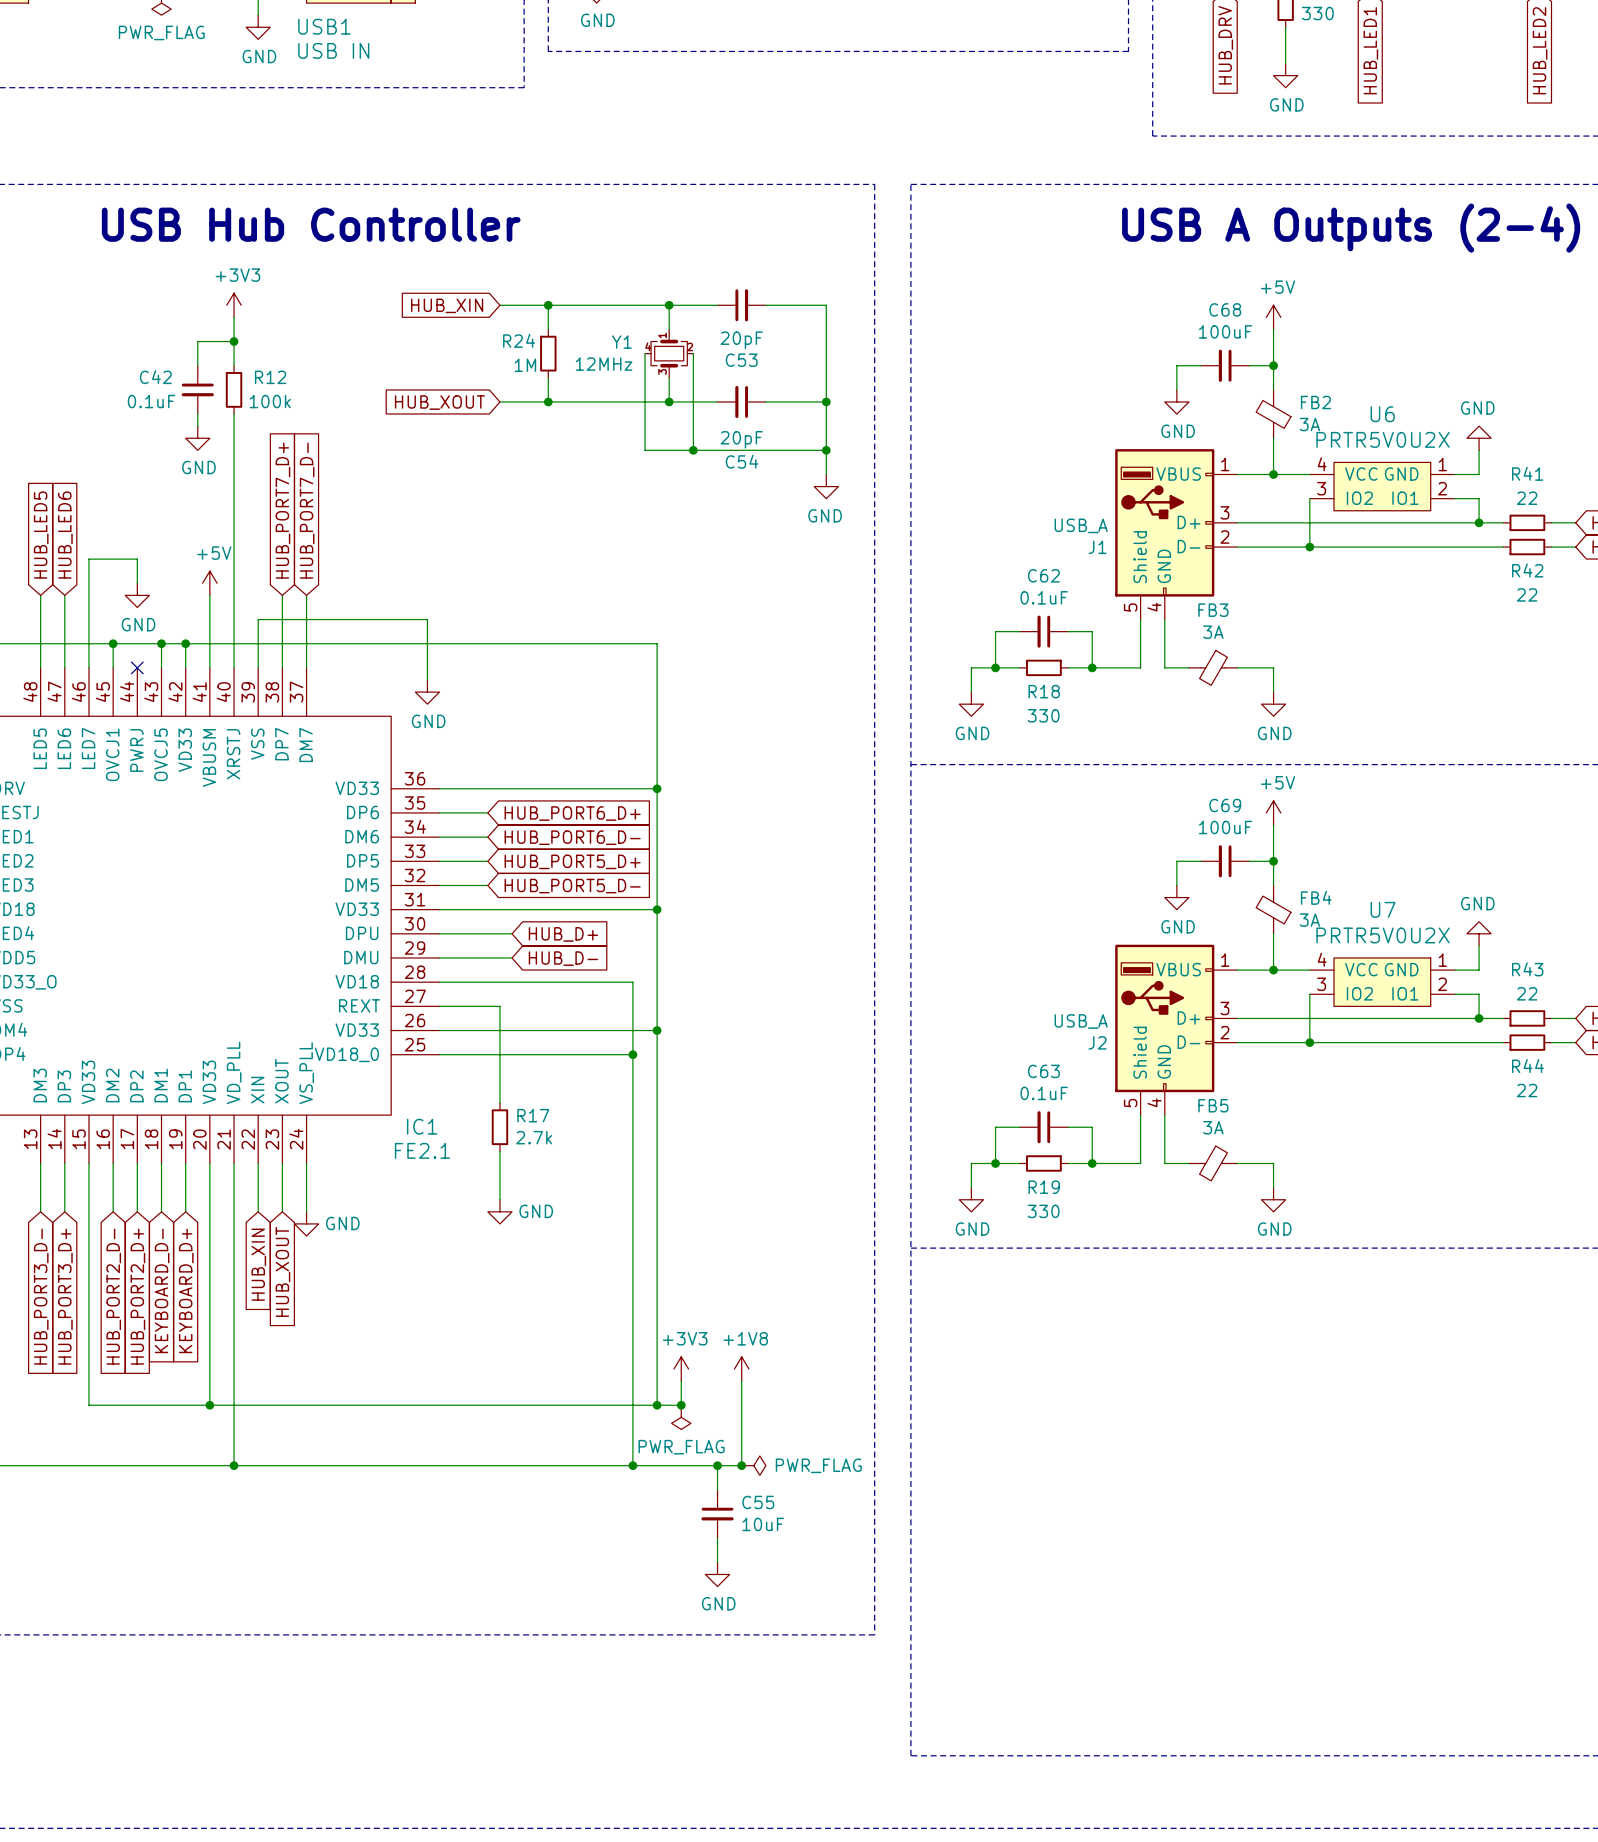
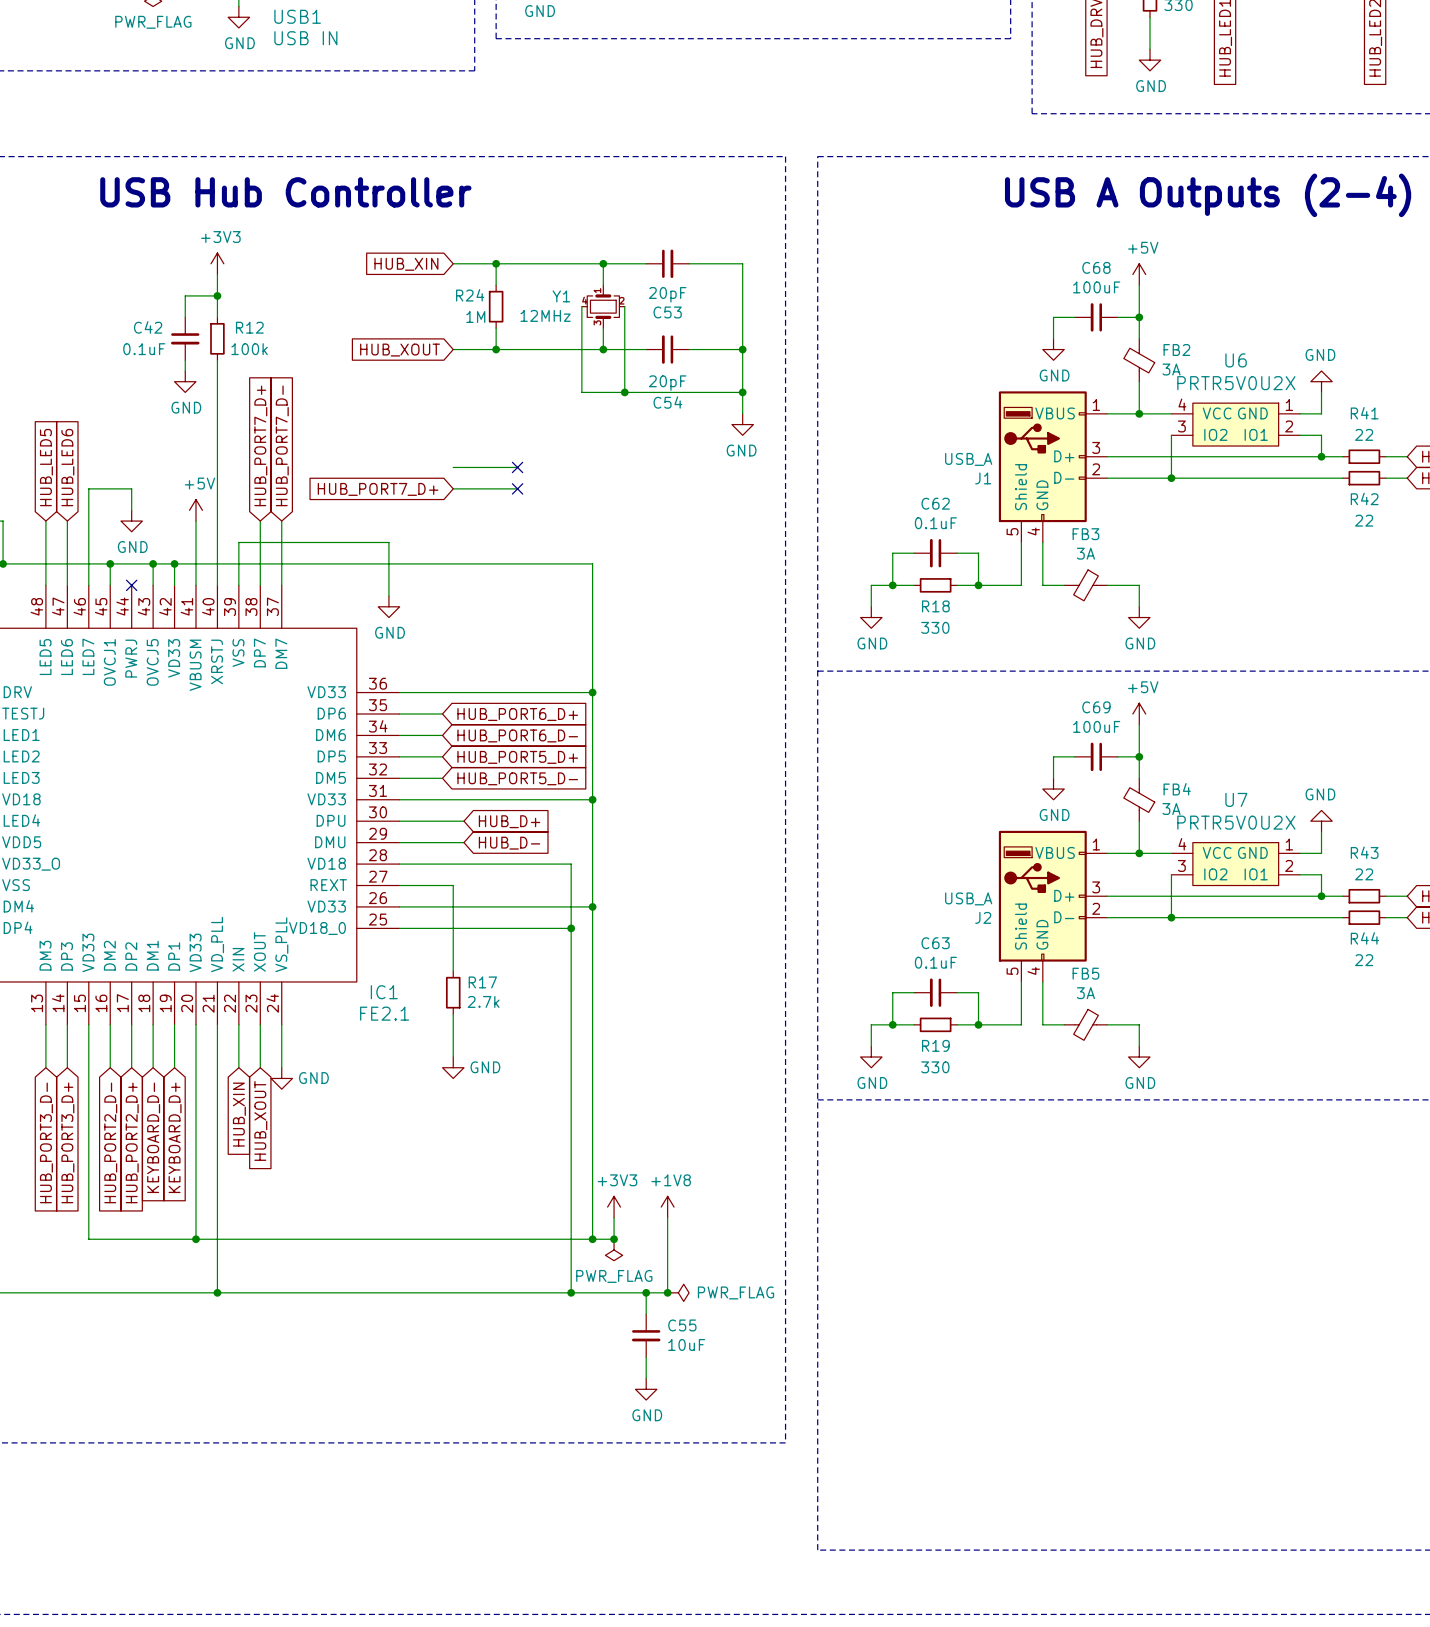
wire: none -> (453, 467) (517, 467)
no-connect mark: none -> (517, 467)
global label: none -> HUB_PORT7_D+ (378, 489)
wire: none -> (453, 488) (517, 488)
no-connect mark: none -> (517, 488)

